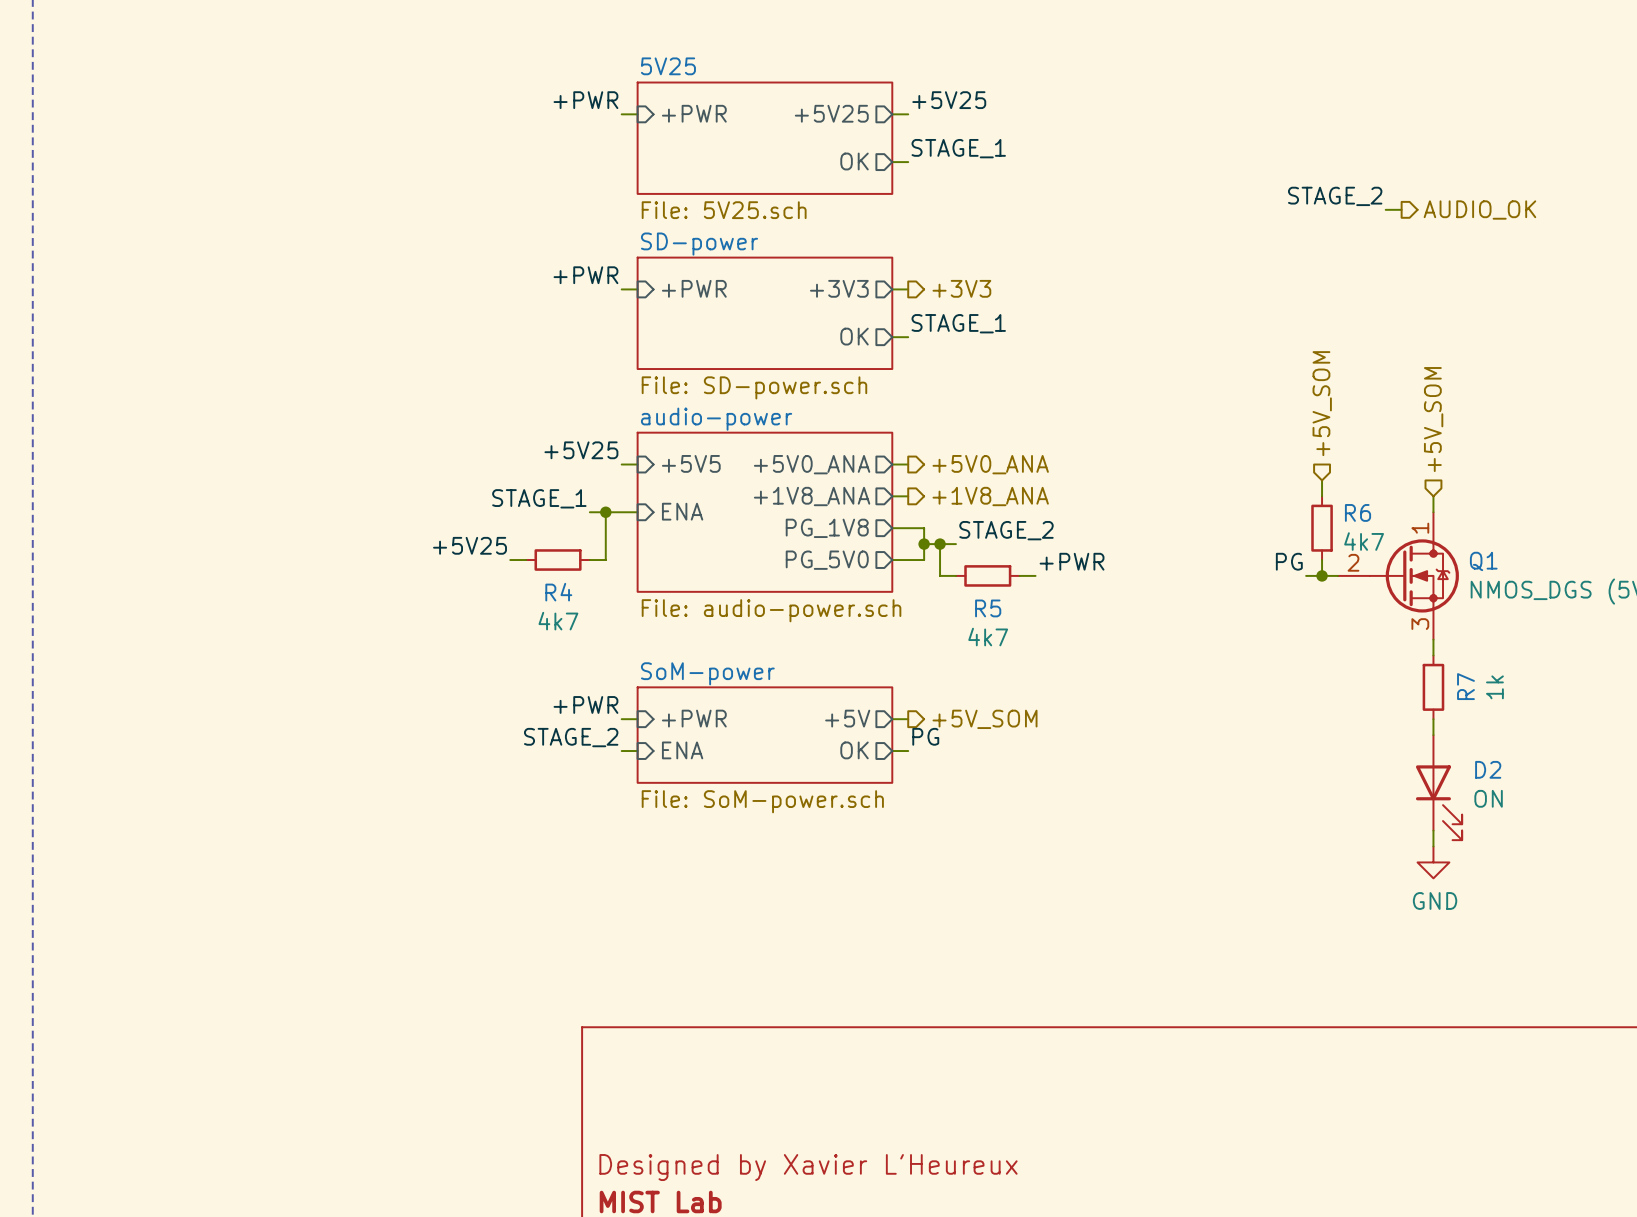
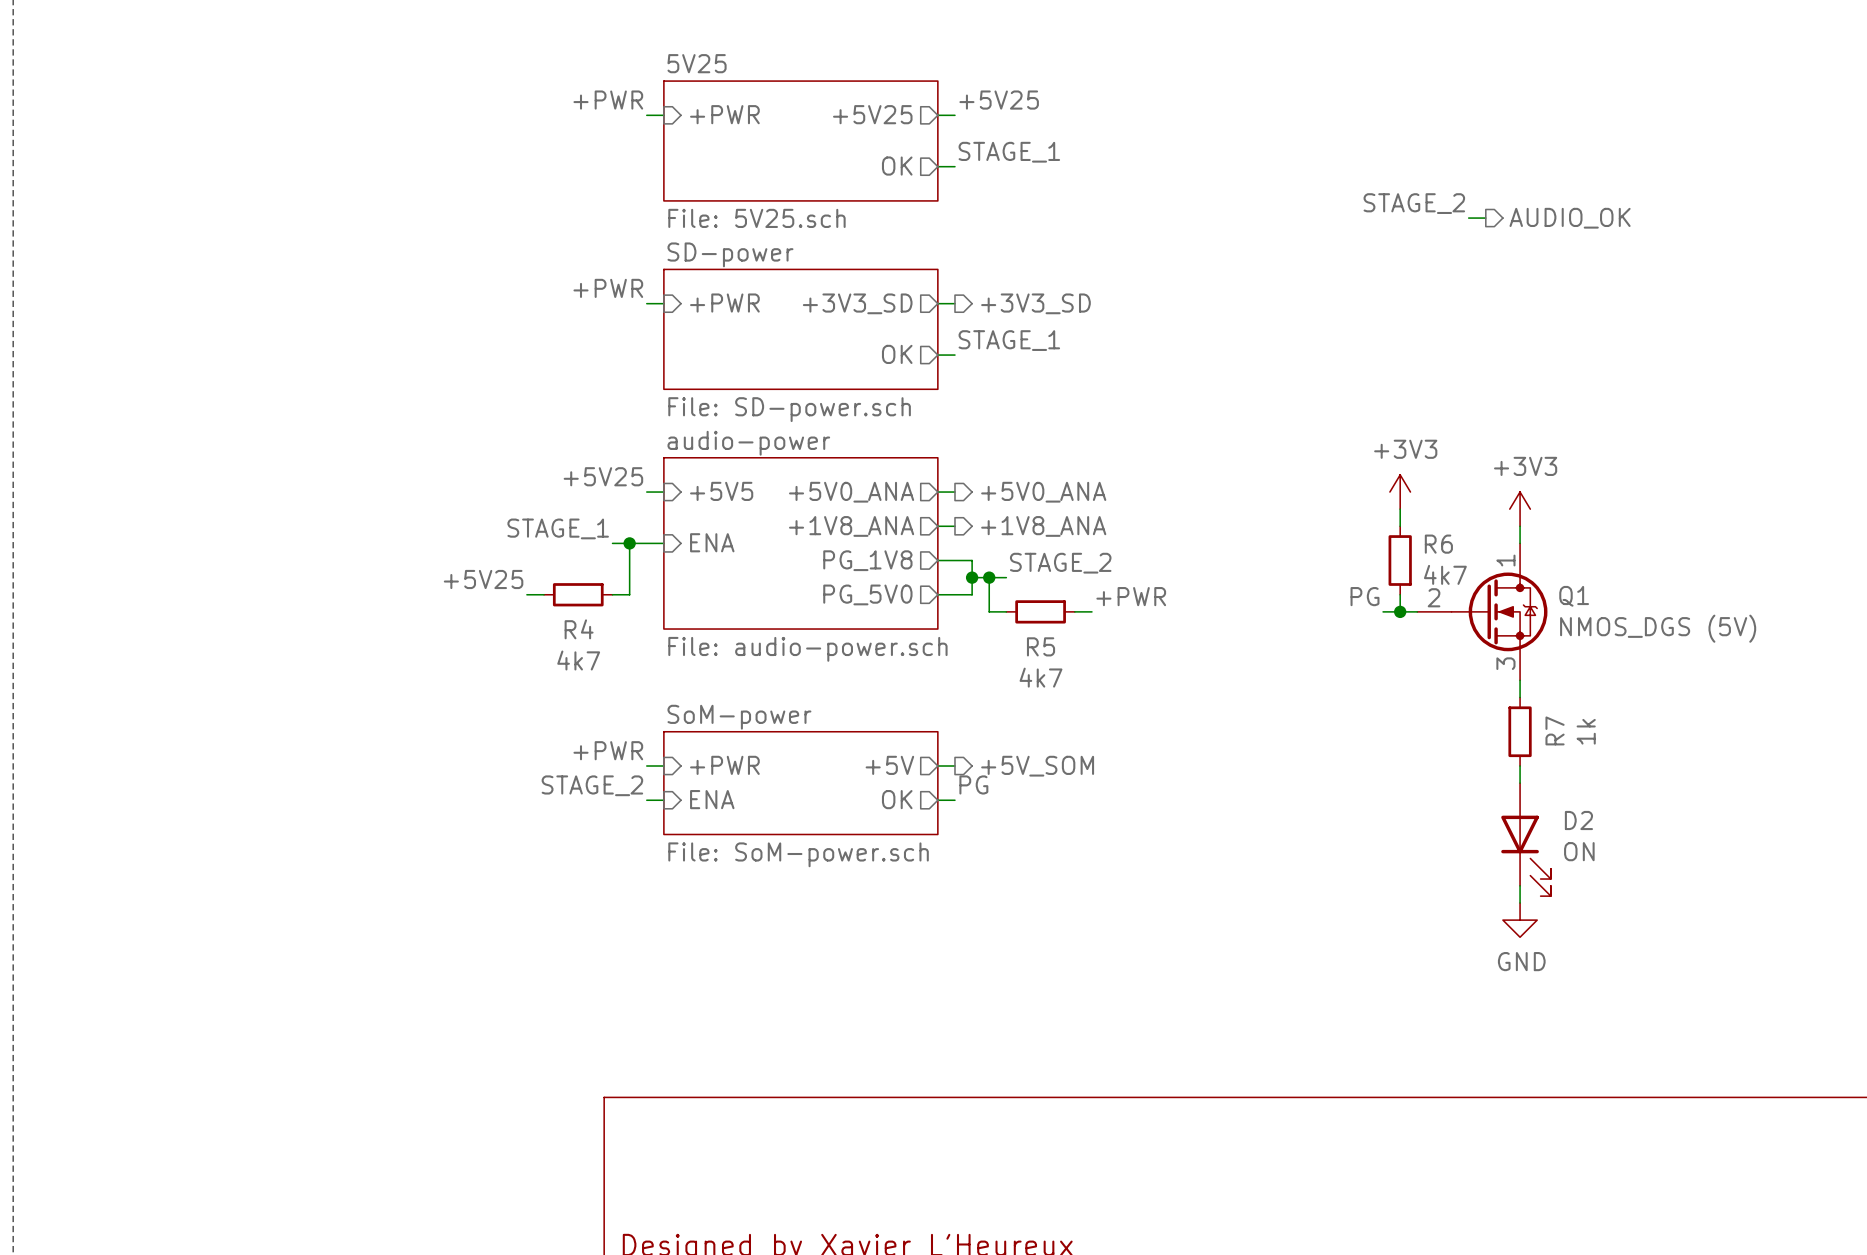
sheet pin: +3V3 (839, 288) -> +3V3_SD (857, 303)
hierarchical label: +3V3 (961, 288) -> +3V3_SD (1035, 303)
hierarchical label: +5V_SOM (1322, 403) -> none
hierarchical label: +5V_SOM (1433, 419) -> none
power symbol: none -> +3V3 (1400, 492)
power symbol: none -> +3V3 (1520, 509)

